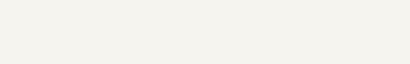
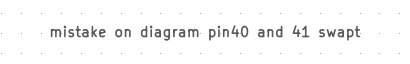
text: none -> mistake on diagram pin40 and 41 swapt (205, 32)

